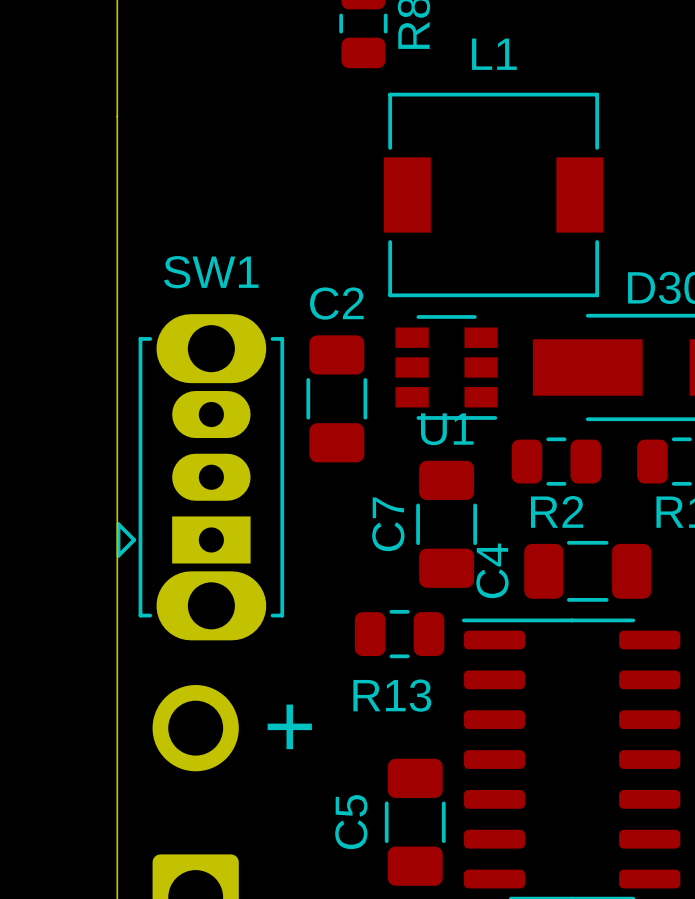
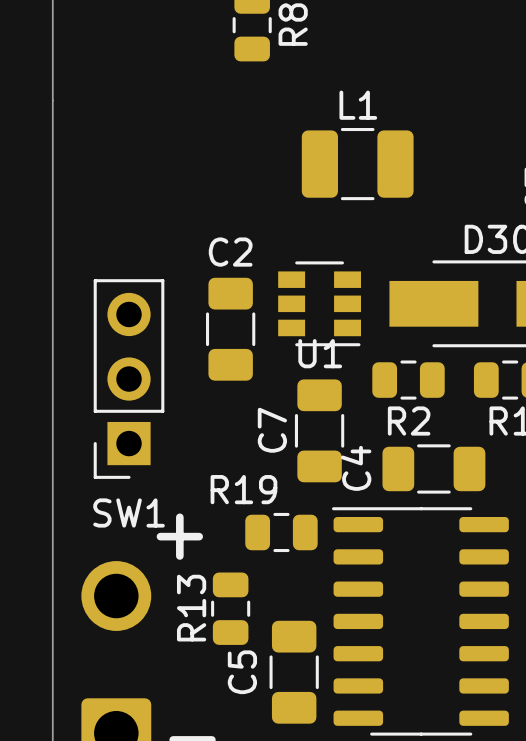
L1 name position: L1 (494, 54) -> L1 (358, 105)
L1 footprint: [383, 92, 604, 298] -> [301, 127, 414, 201]
SW1 name position: SW1 (211, 272) -> SW1 (129, 512)
SW1 footprint: [116, 314, 285, 641] -> [93, 279, 165, 479]
R13 rotation: 0° (399, 634) -> 90° clockwise (230, 608)
R13 position: (399, 634) -> (230, 608)
R19: none -> (281, 532)
text position: + (289, 726) -> + (179, 536)

